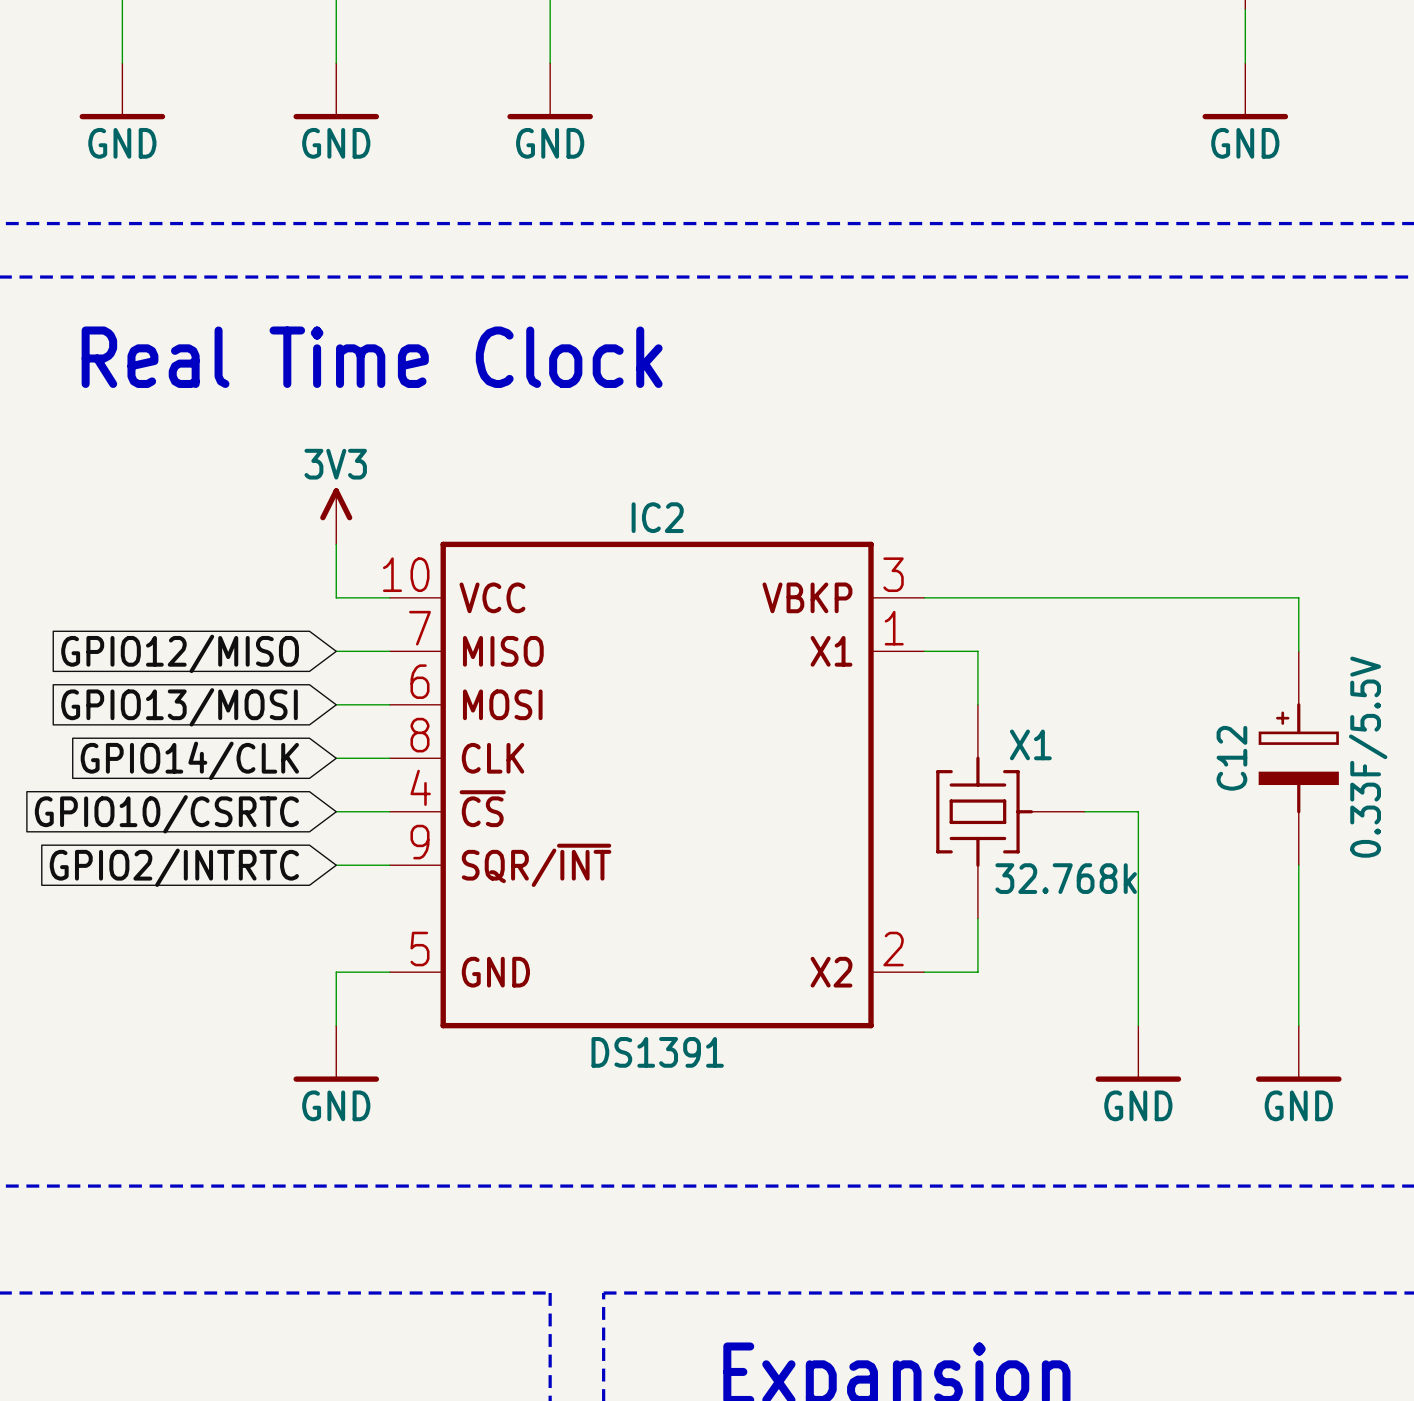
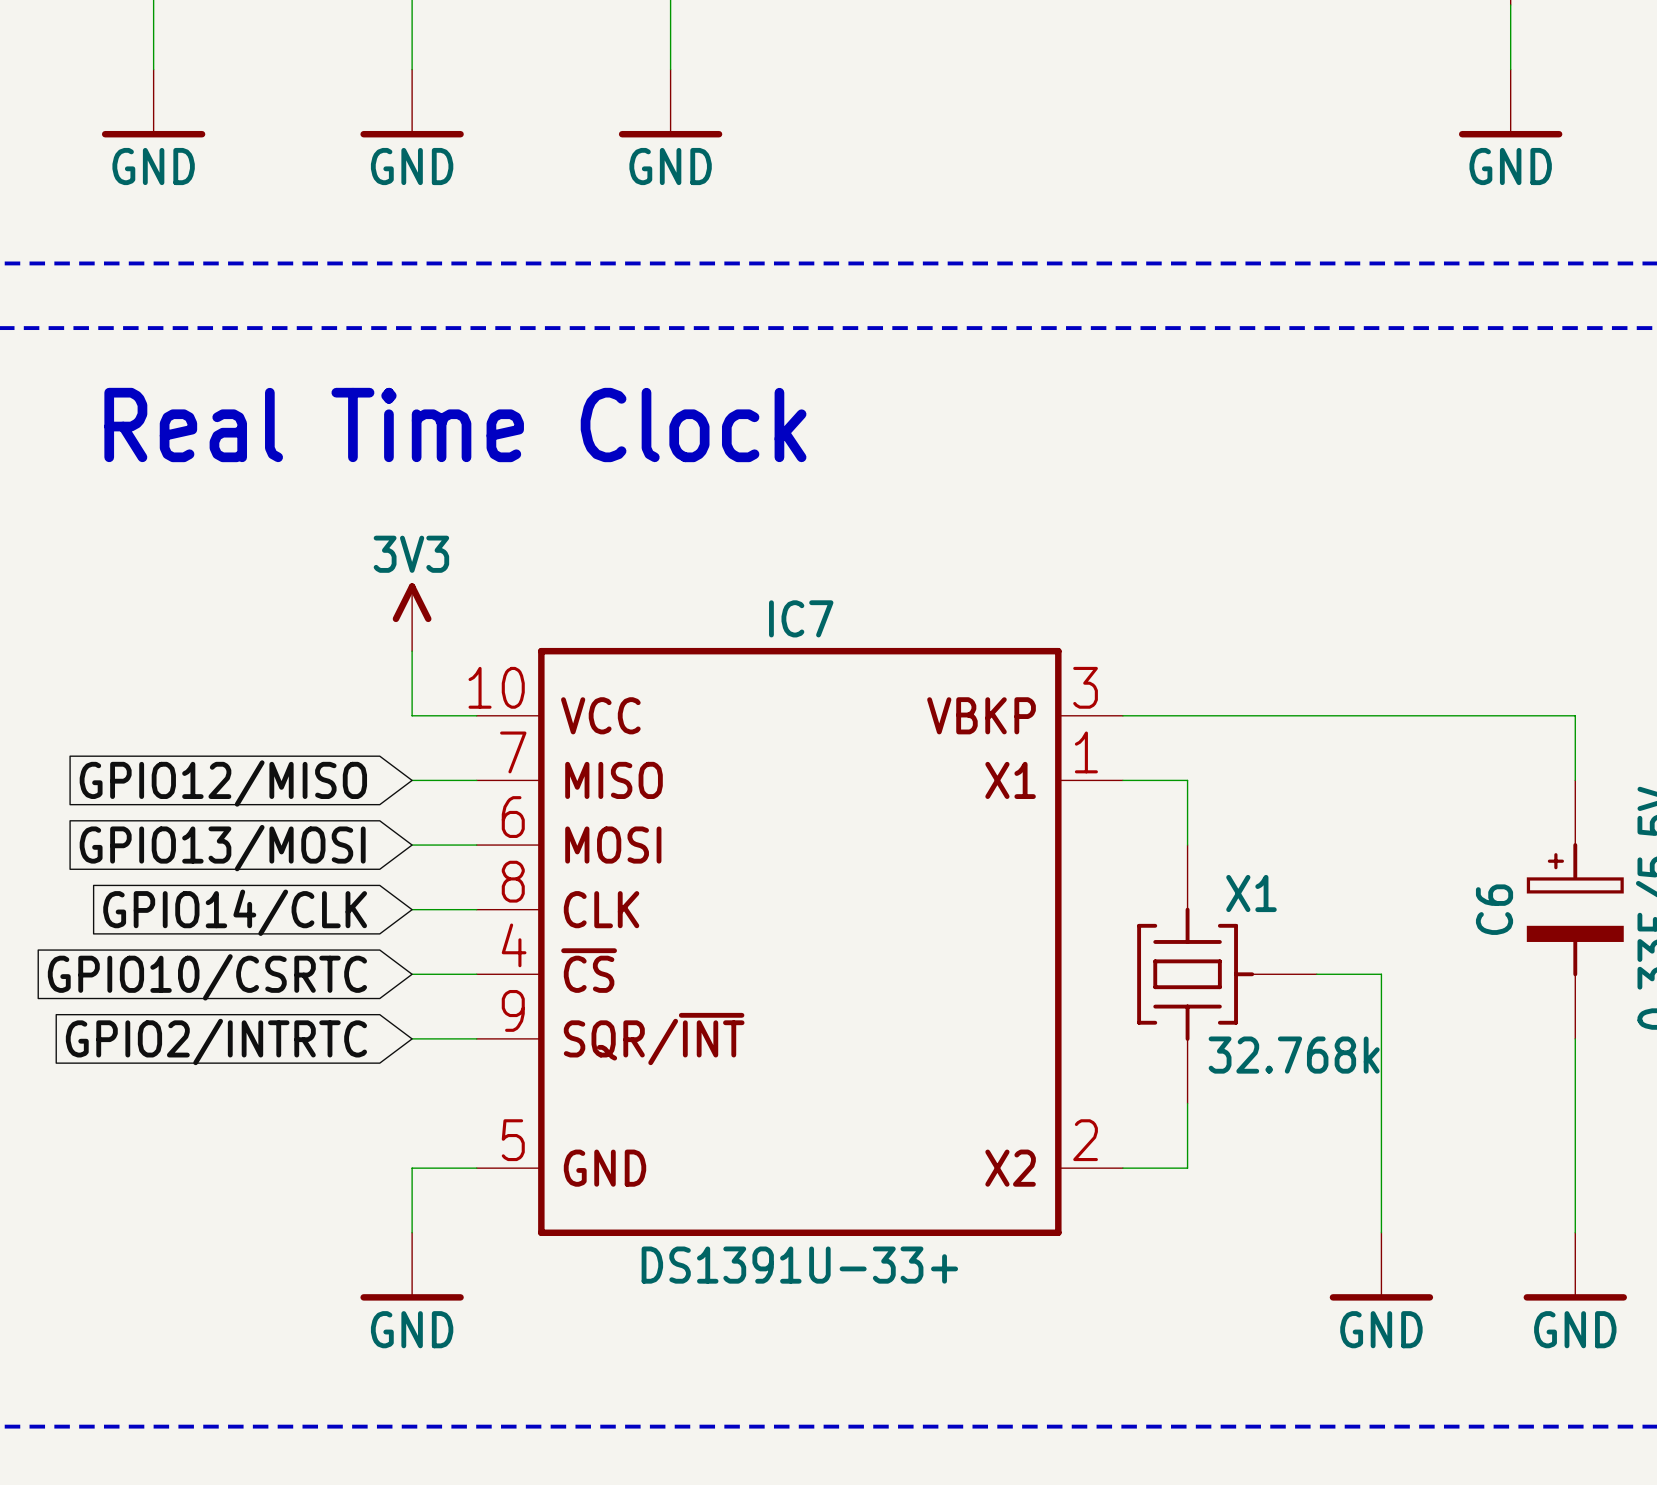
IC2 name: IC2 (657, 517) -> IC7 (801, 618)
C12 name: C12 (1231, 758) -> C6 (1494, 909)
IC2 value: DS1391 (657, 1052) -> DS1391U-33+ (799, 1265)

